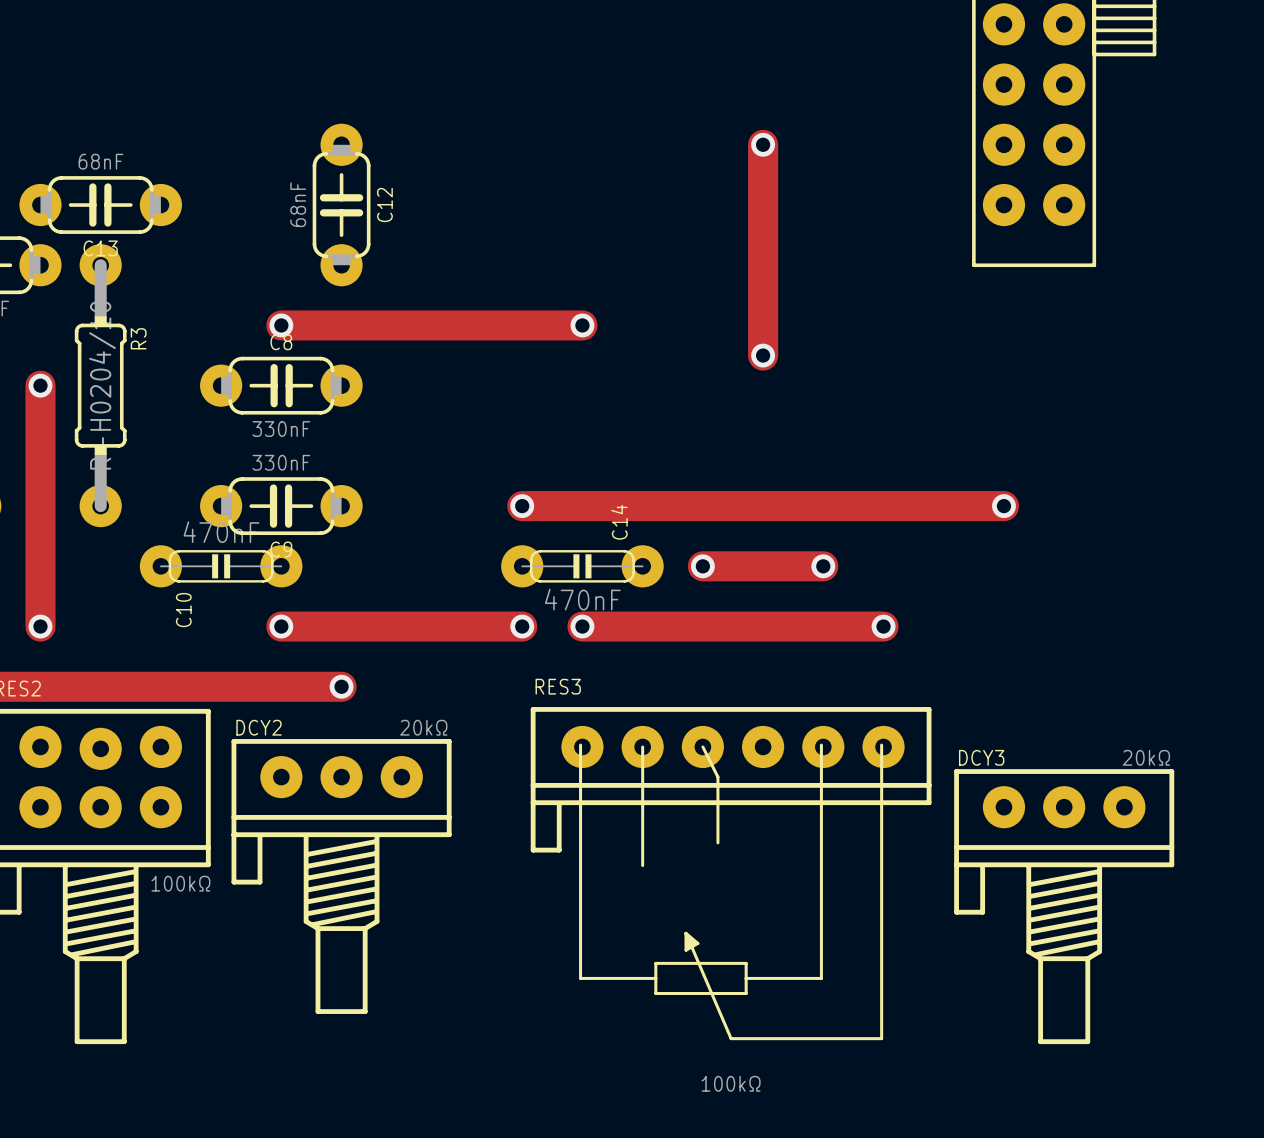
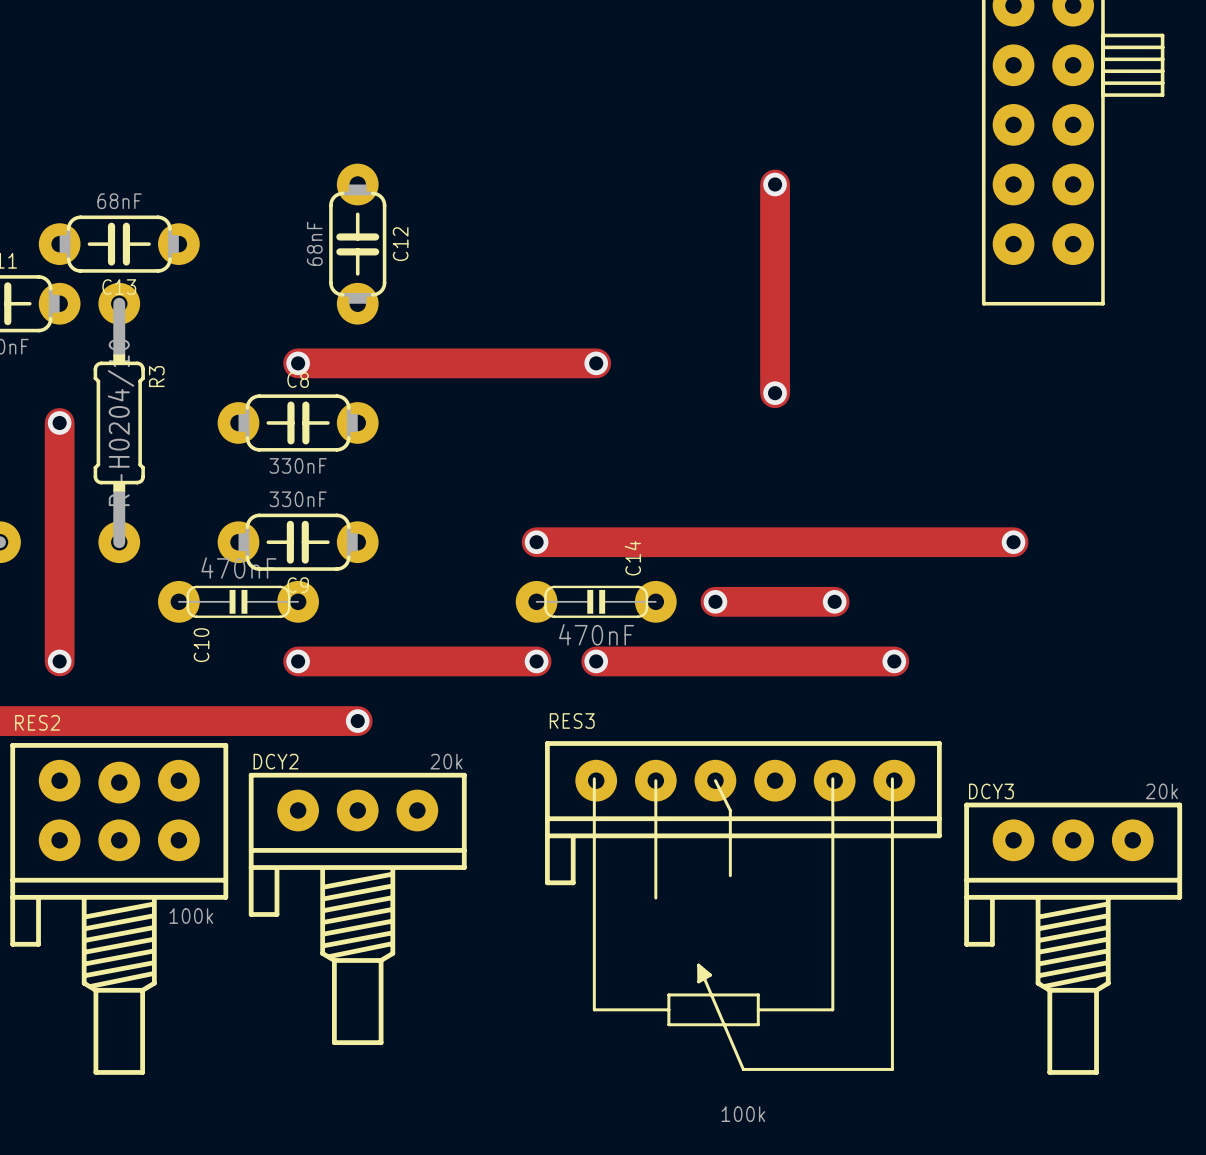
DCY2 value: 20kΩ (423, 727) -> 20k (446, 761)
DCY3 value: 20kΩ (1146, 757) -> 20k (1161, 791)
RES2 value: 100kΩ (180, 883) -> 100k (191, 916)
RES3 value: 100kΩ (731, 1083) -> 100k (743, 1114)

